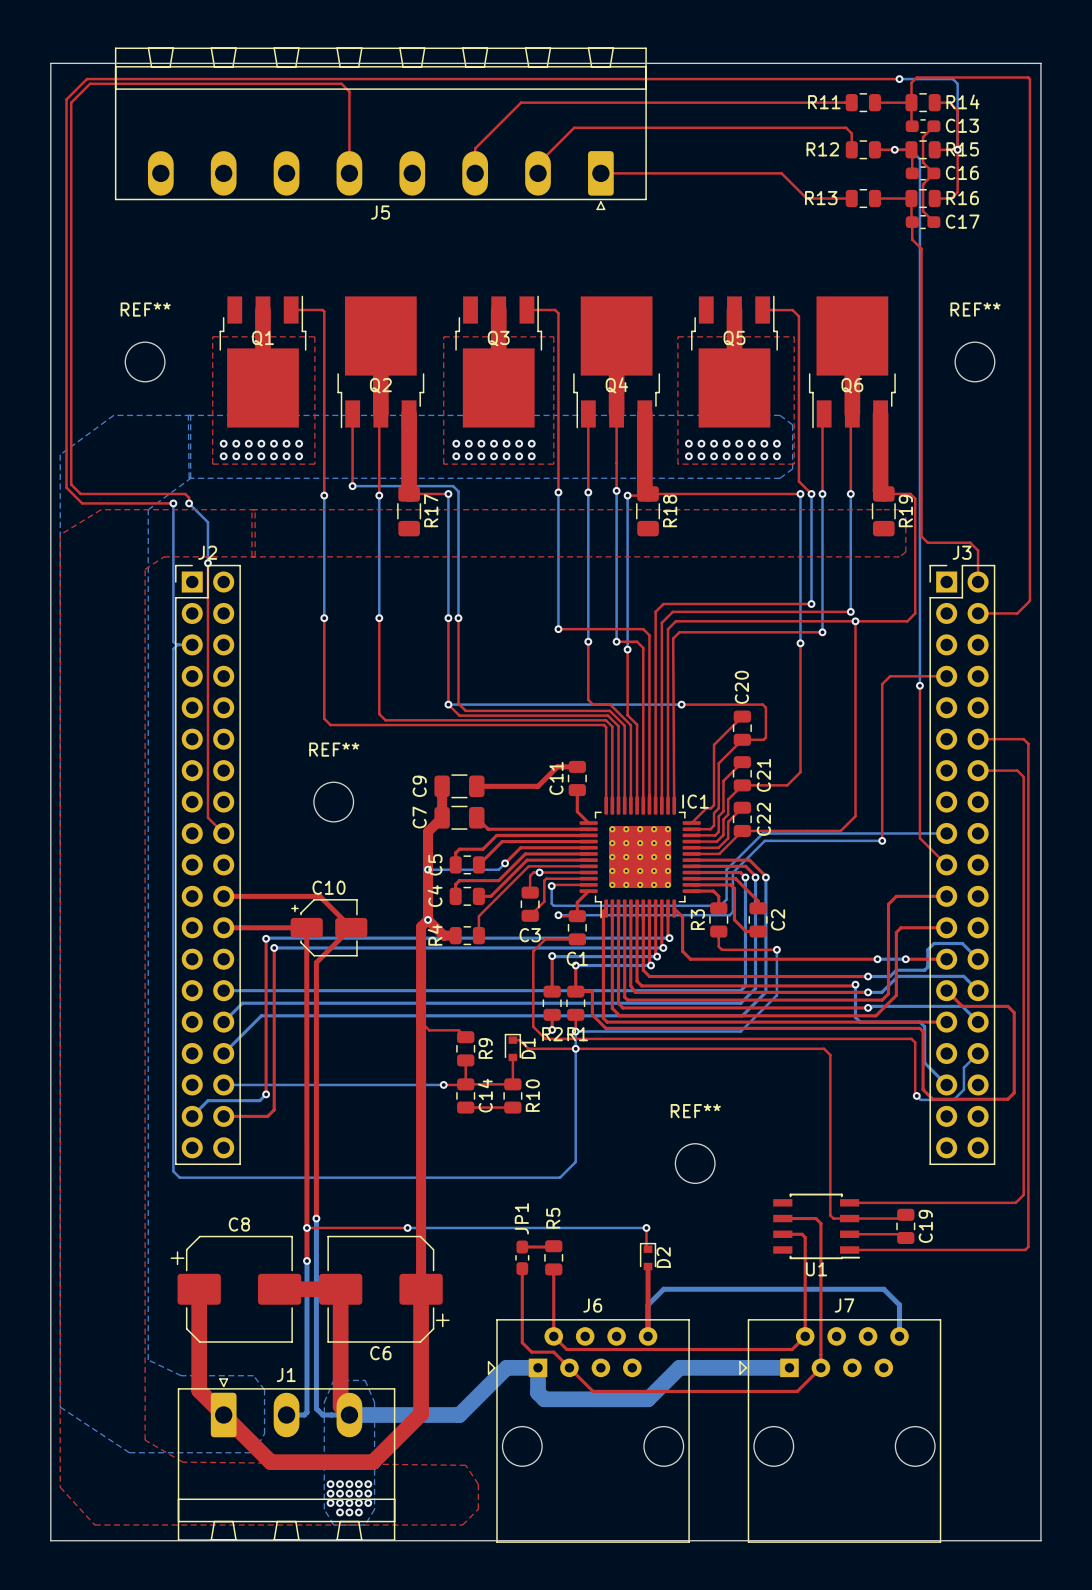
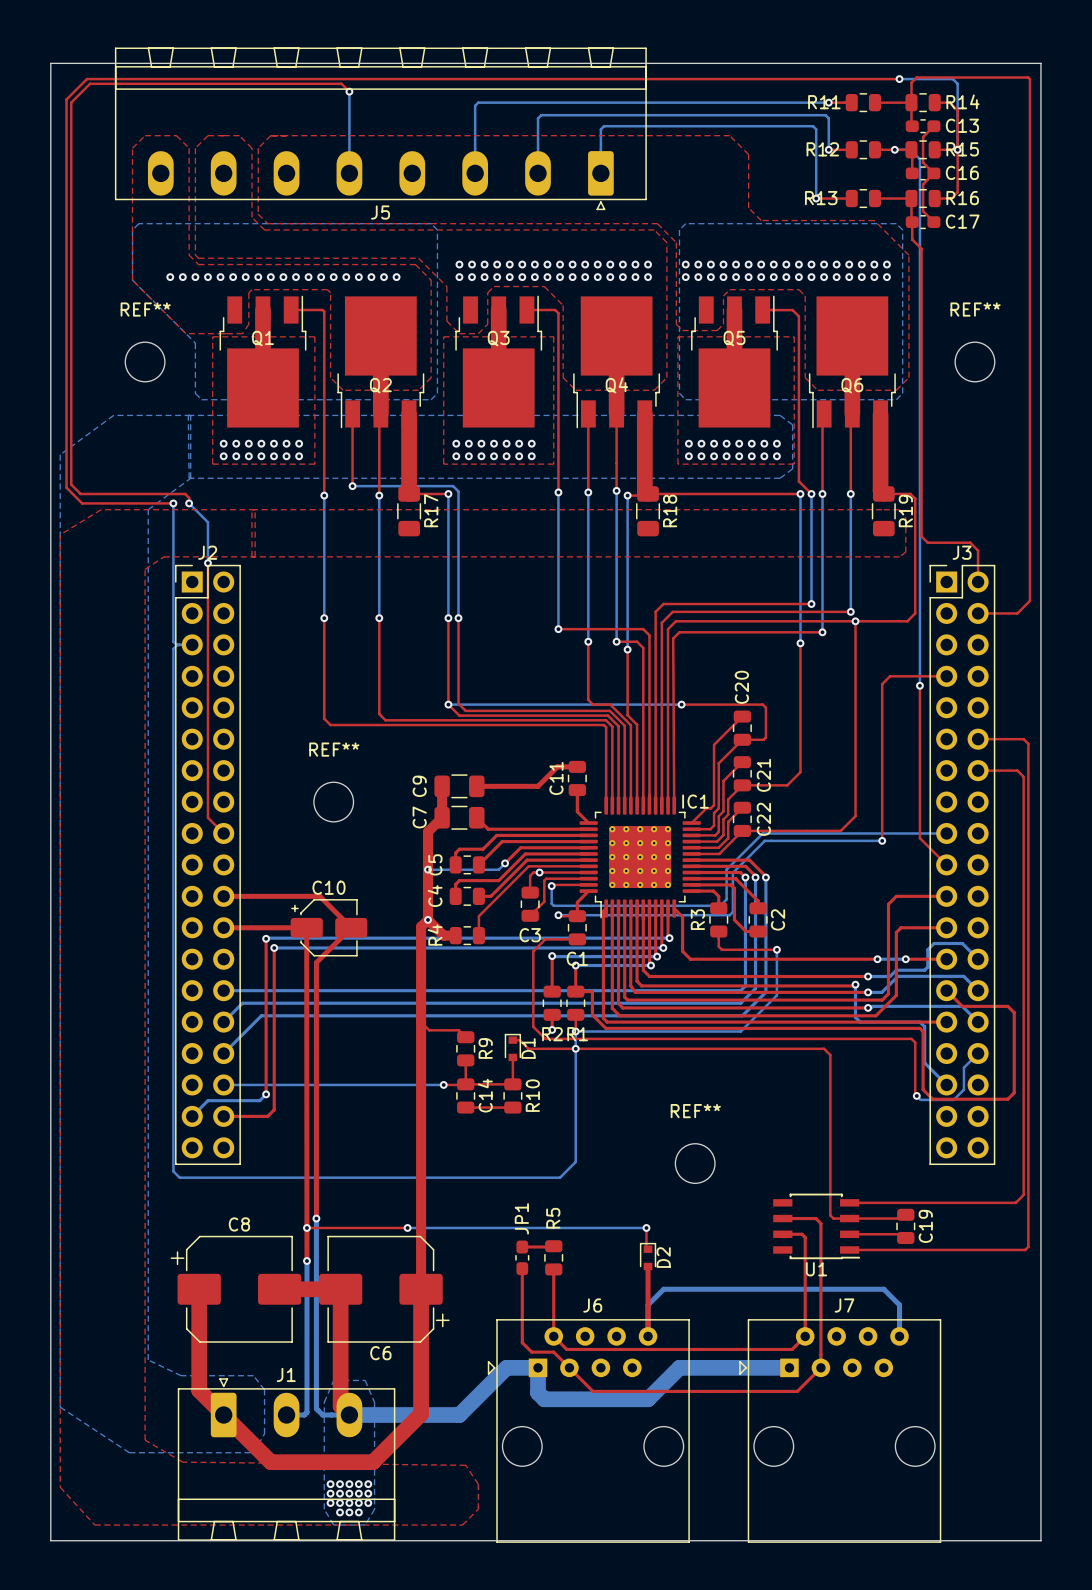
top track: (349, 91) (349, 173) -> none
bottom track: none -> (349, 91) (349, 173)
via: none -> (349, 91)
top track: (828, 102) (521, 102) (475, 148) (475, 173) -> none
bottom track: none -> (828, 102) (478, 102) (475, 105) (475, 173)
via: none -> (828, 102)
top zone outline: none -> (145, 135) (132, 148) (132, 280) (185, 333) (242, 333) (248, 324) (248, 292) (251, 289) (327, 289) (330, 292) (330, 377) (343, 390) (418, 390) (431, 377) (431, 280) (415, 264) (198, 264) (189, 255) (189, 148) (176, 135) (145, 135)
top zone outline: none -> (207, 135) (239, 135) (251, 148) (251, 217) (264, 229) (654, 229) (666, 242) (666, 377) (654, 390) (575, 390) (563, 377) (563, 305) (544, 286) (494, 286) (487, 292) (487, 324) (478, 333) (459, 333) (446, 321) (446, 286) (418, 258) (198, 258) (195, 255) (195, 148) (207, 135)
top zone outline: none -> (270, 135) (729, 135) (748, 154) (748, 207) (761, 220) (874, 220) (908, 255) (908, 377) (896, 390) (817, 390) (805, 377) (805, 295) (798, 289) (729, 289) (723, 295) (723, 324) (717, 330) (682, 330) (676, 324) (676, 242) (657, 223) (267, 223) (258, 214) (258, 148) (270, 135)
bottom track: none -> (828, 149) (828, 118) (825, 115) (541, 115) (538, 118) (538, 173)
via: none -> (828, 149)
top track: (851, 149) (851, 133) (846, 127) (574, 127) (538, 163) -> (851, 149) (828, 149)
top track: (600, 173) (781, 173) (806, 198) (816, 198) -> none
bottom track: none -> (600, 173) (600, 129) (604, 126) (813, 126) (816, 129) (816, 198)
via: none -> (816, 198)
bottom zone outline: none -> (138, 223) (431, 223) (437, 229) (437, 393) (431, 399) (201, 399) (195, 393) (195, 343) (132, 280) (132, 229) (138, 223)
bottom zone outline: none -> (685, 223) (896, 223) (902, 229) (902, 393) (896, 399) (685, 399) (679, 393) (679, 229) (685, 223)
via: none -> (459, 264)
via: none -> (472, 264)
via: none -> (484, 264)
via: none -> (497, 264)
via: none -> (509, 264)
via: none -> (522, 264)
via: none -> (534, 264)
via: none -> (547, 264)
via: none -> (560, 264)
via: none -> (572, 264)
via: none -> (585, 264)
via: none -> (597, 264)
via: none -> (610, 264)
via: none -> (622, 264)
via: none -> (635, 264)
via: none -> (648, 264)
via: none -> (685, 264)
via: none -> (698, 264)
via: none -> (710, 264)
via: none -> (723, 264)
via: none -> (736, 264)
via: none -> (748, 264)
via: none -> (761, 264)
via: none -> (773, 264)
via: none -> (786, 264)
via: none -> (798, 264)
via: none -> (811, 264)
via: none -> (824, 264)
via: none -> (836, 264)
via: none -> (849, 264)
via: none -> (861, 264)
via: none -> (874, 264)
via: none -> (886, 264)
via: none -> (170, 277)
via: none -> (182, 277)
via: none -> (195, 277)
via: none -> (207, 277)
via: none -> (220, 277)
via: none -> (233, 277)
via: none -> (245, 277)
via: none -> (258, 277)
via: none -> (270, 277)
via: none -> (283, 277)
via: none -> (295, 277)
via: none -> (308, 277)
via: none -> (321, 277)
via: none -> (333, 277)
via: none -> (346, 277)
via: none -> (358, 277)
via: none -> (371, 277)
via: none -> (384, 277)
via: none -> (396, 277)
via: none -> (459, 277)
via: none -> (472, 277)
via: none -> (484, 277)
via: none -> (497, 277)
via: none -> (509, 277)
via: none -> (522, 277)
via: none -> (534, 277)
via: none -> (547, 277)
via: none -> (560, 277)
via: none -> (572, 277)
via: none -> (585, 277)
via: none -> (597, 277)
via: none -> (610, 277)
via: none -> (622, 277)
via: none -> (635, 277)
via: none -> (648, 277)
via: none -> (685, 277)
via: none -> (698, 277)
via: none -> (710, 277)
via: none -> (723, 277)
via: none -> (736, 277)
via: none -> (748, 277)
via: none -> (761, 277)
via: none -> (773, 277)
via: none -> (786, 277)
via: none -> (798, 277)
via: none -> (811, 277)
via: none -> (824, 277)
via: none -> (836, 277)
via: none -> (849, 277)
via: none -> (861, 277)
via: none -> (874, 277)
via: none -> (886, 277)

